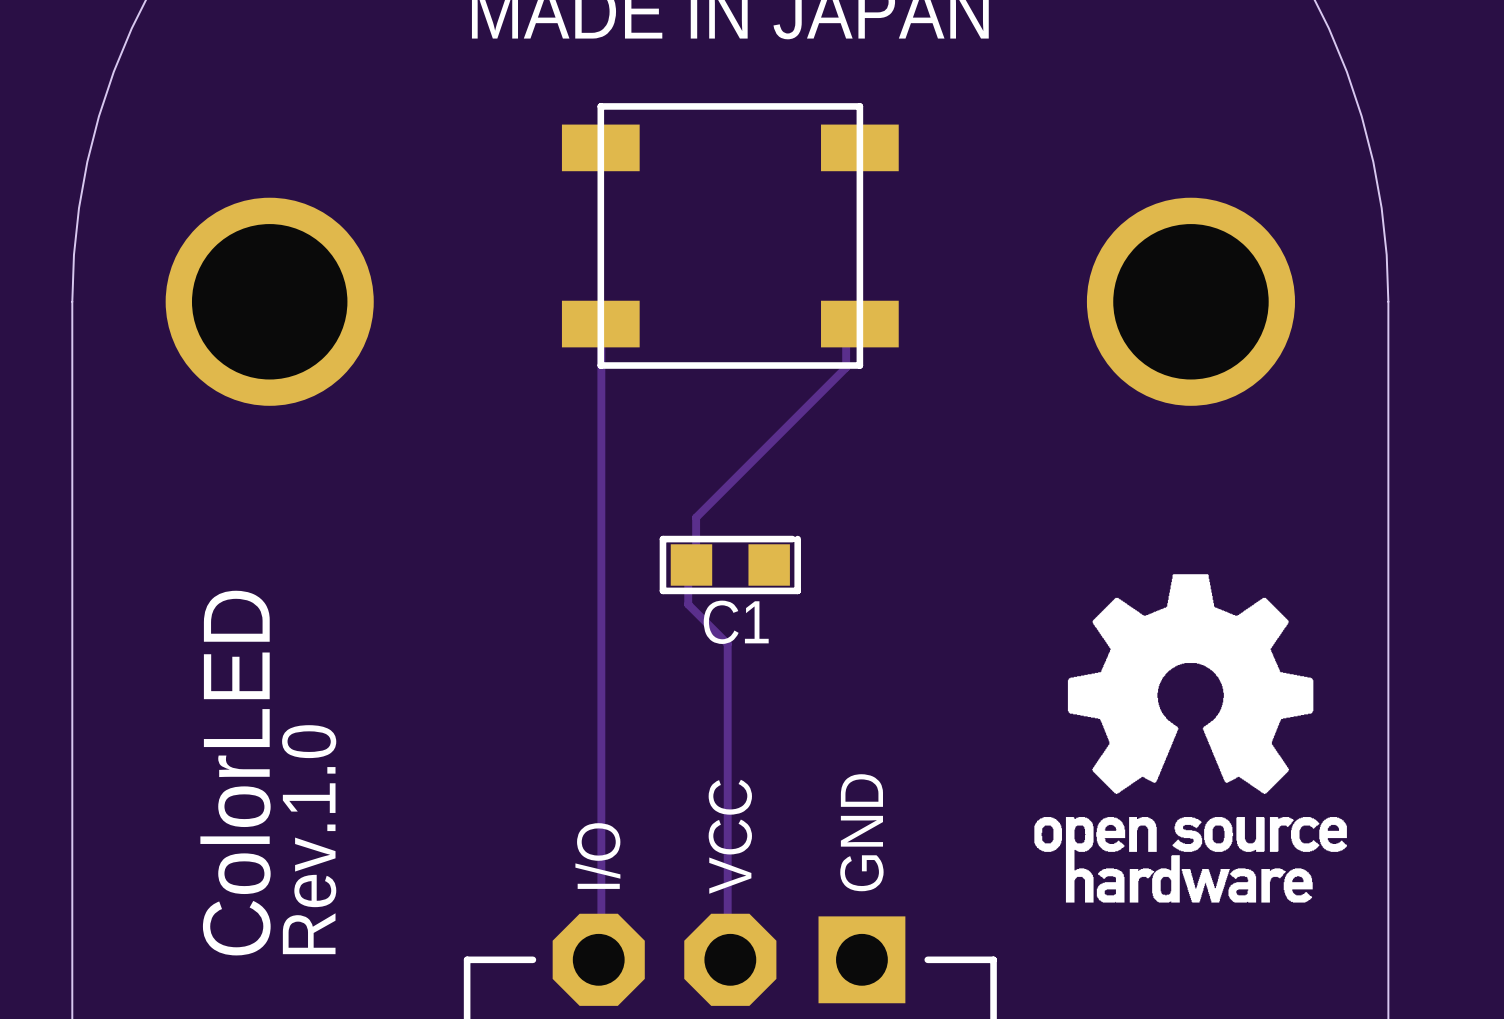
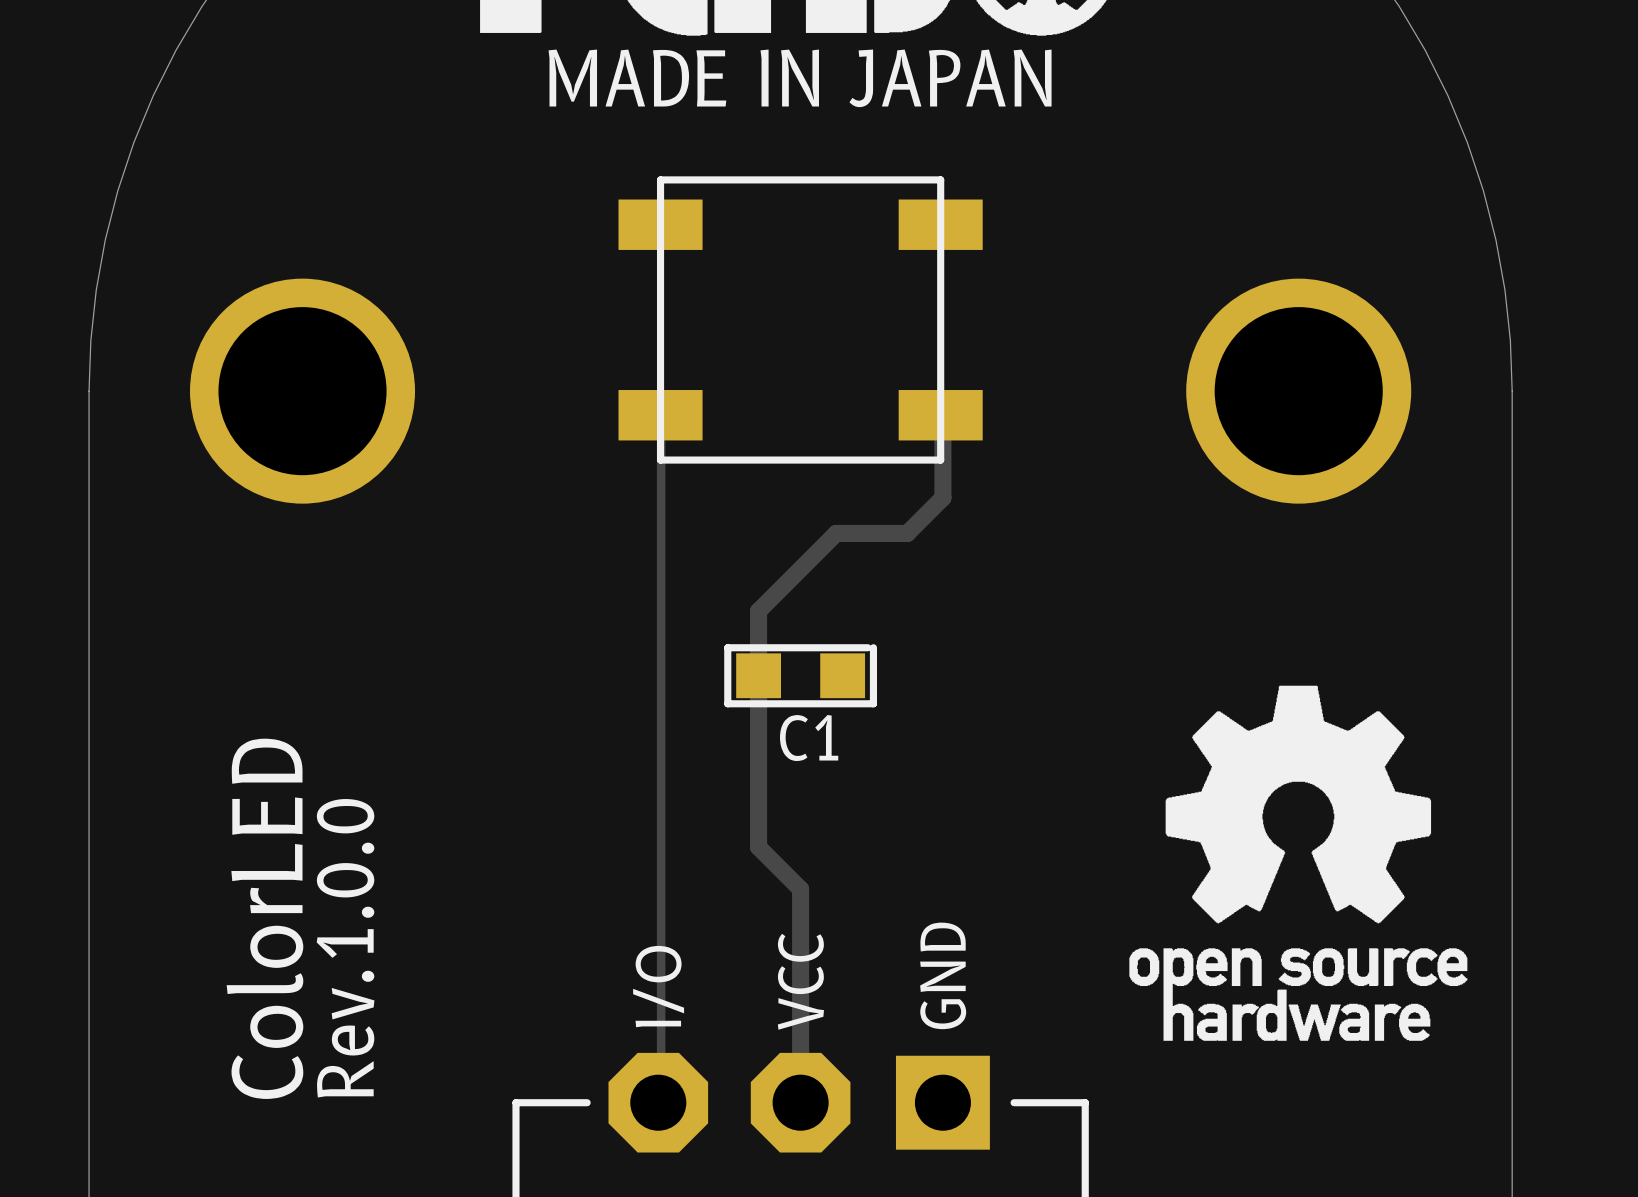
track: (859, 324) (846, 335) (846, 367) (696, 517) (696, 564) (688, 564) (688, 604) (727, 643) (727, 959) (730, 959) -> (940, 415) (942, 417) (942, 497) (907, 533) (836, 533) (758, 611) (758, 847) (800, 889) (800, 1102)
text: Rev.1.0 (309, 839) -> Rev.1.0.0 (345, 948)

